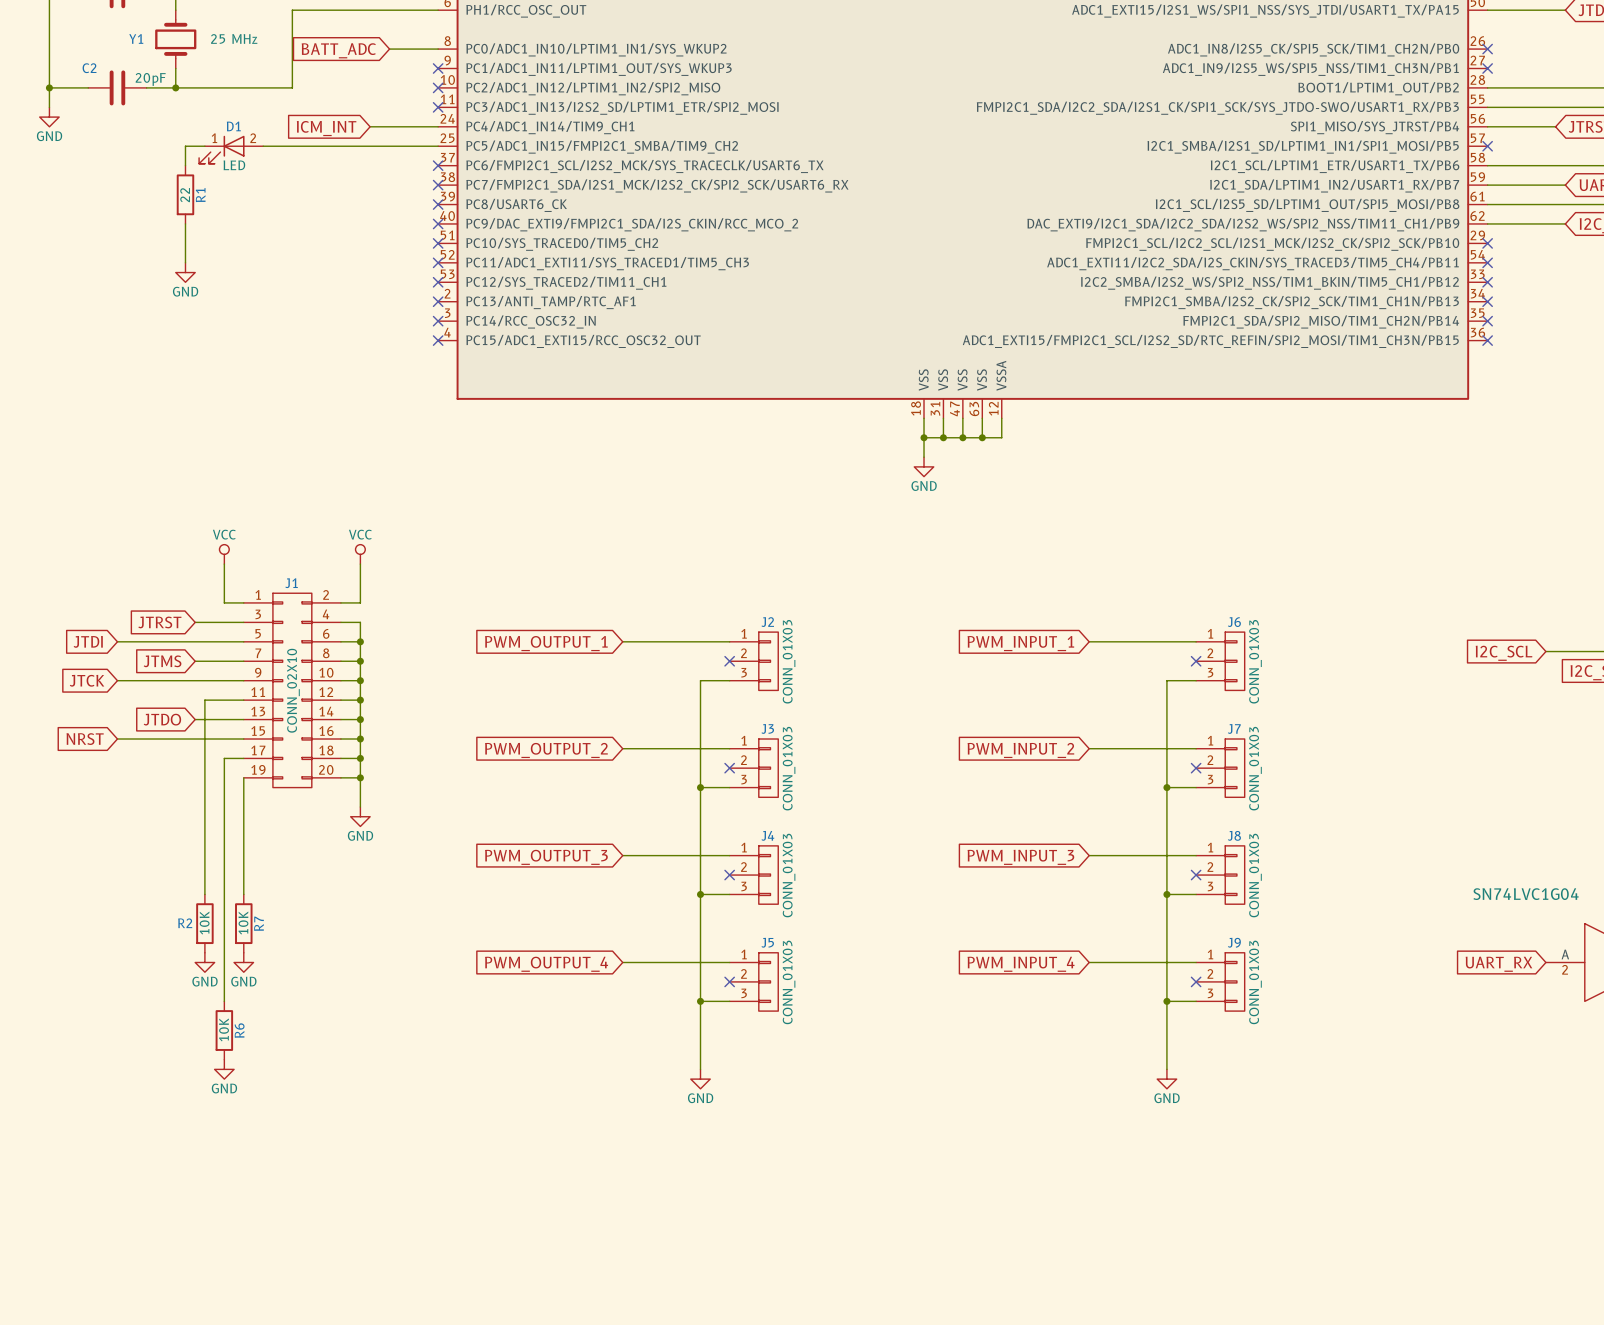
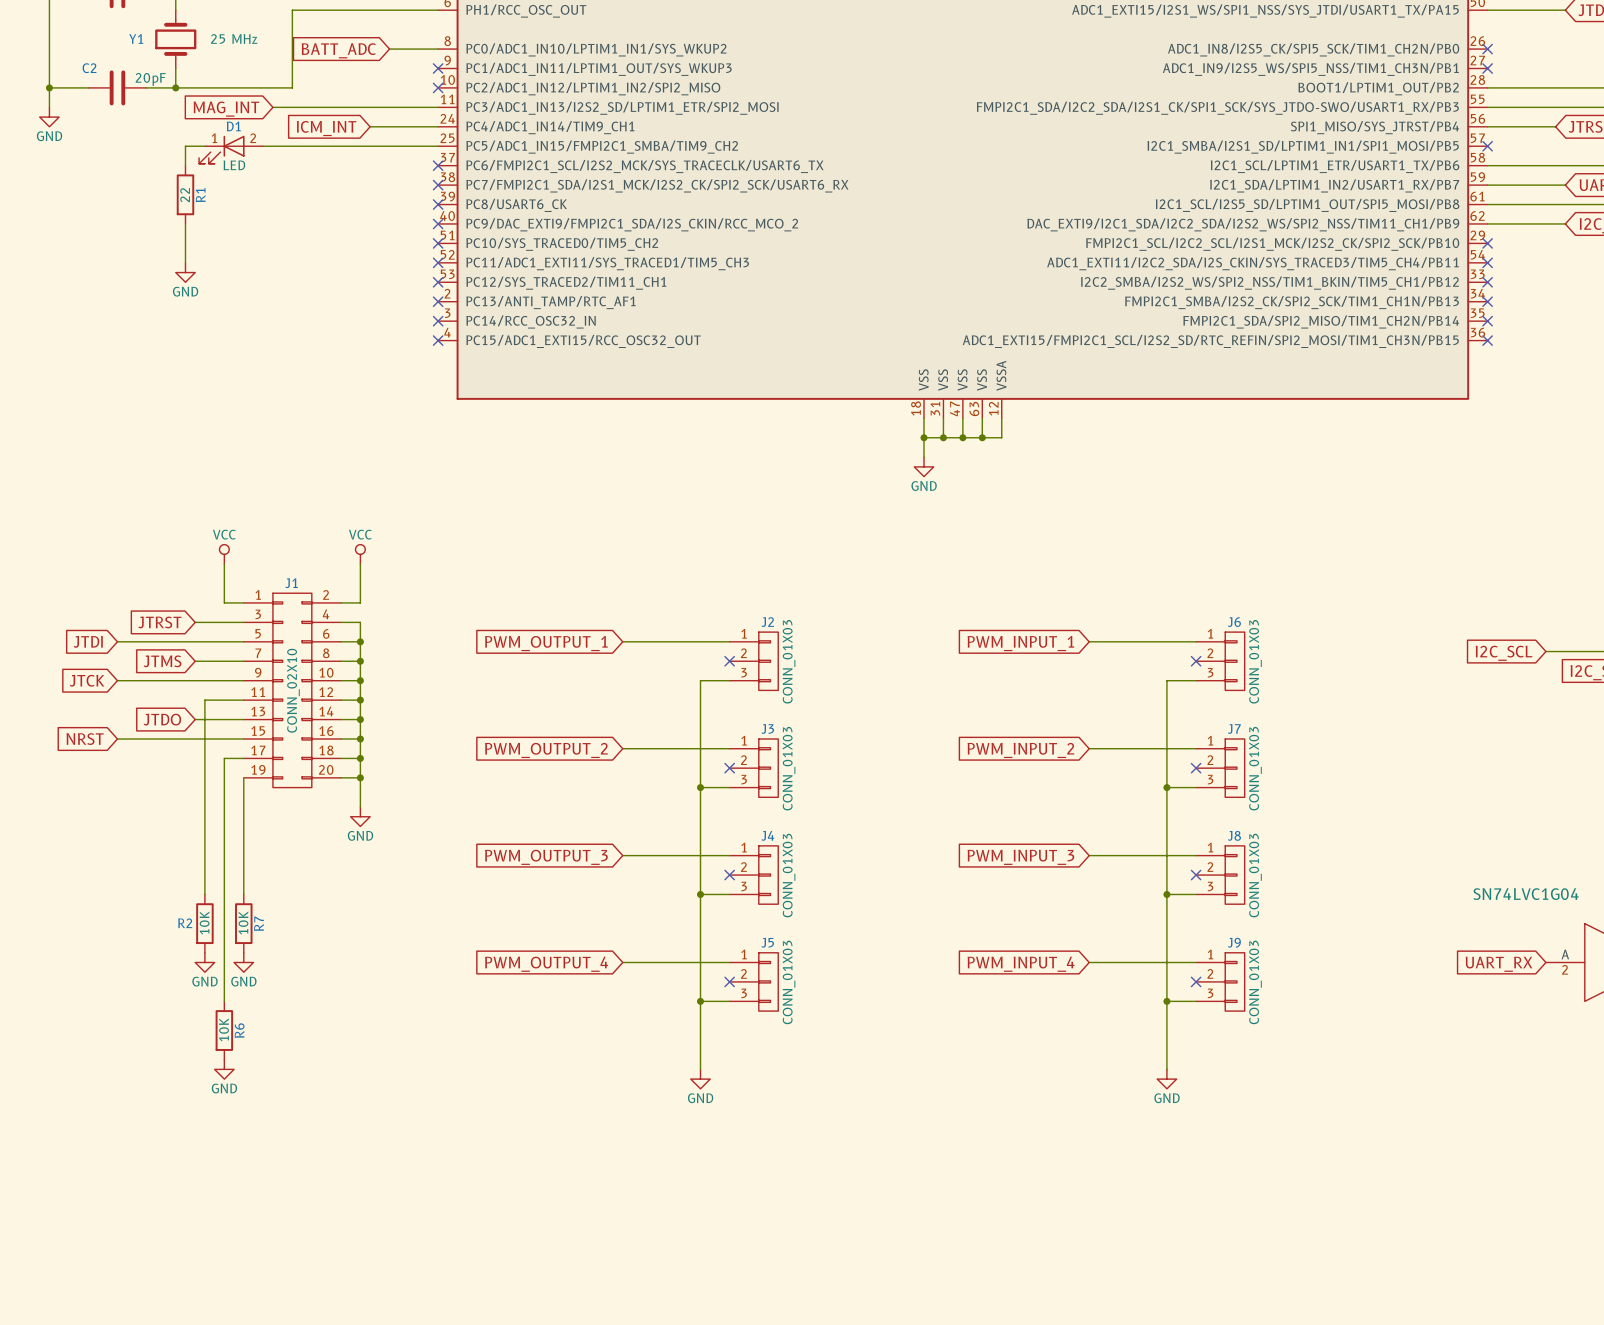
wire: none -> (272, 107) (438, 107)
no-connect mark: (438, 107) -> none
global label: none -> MAG_INT (226, 109)

